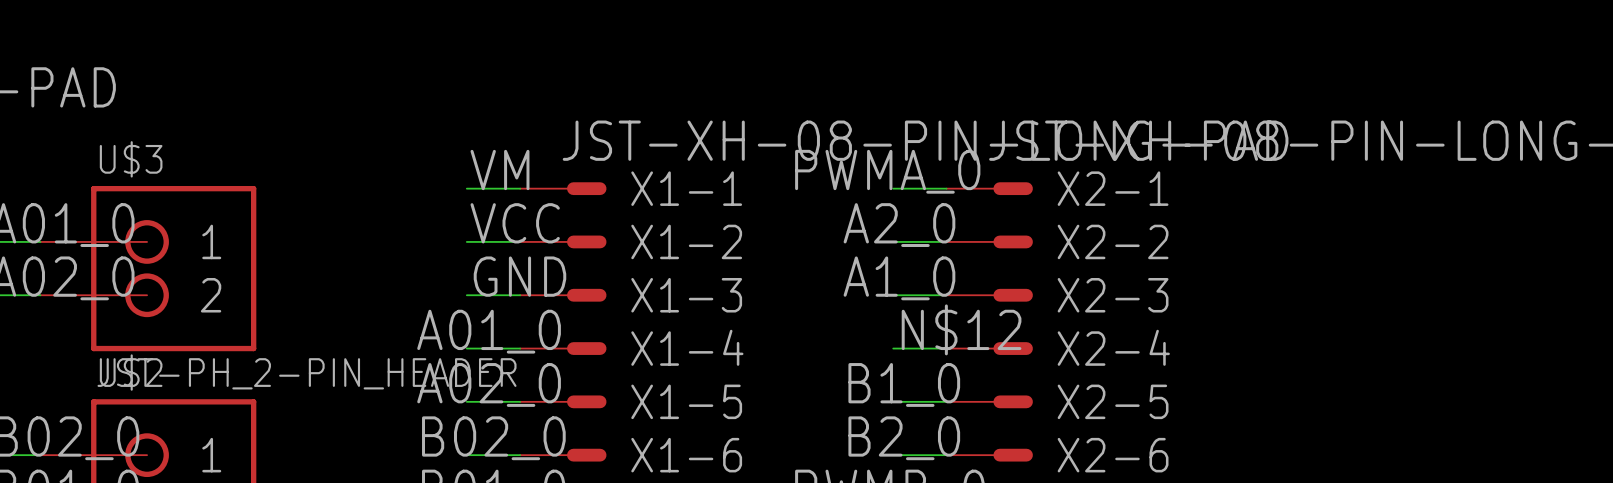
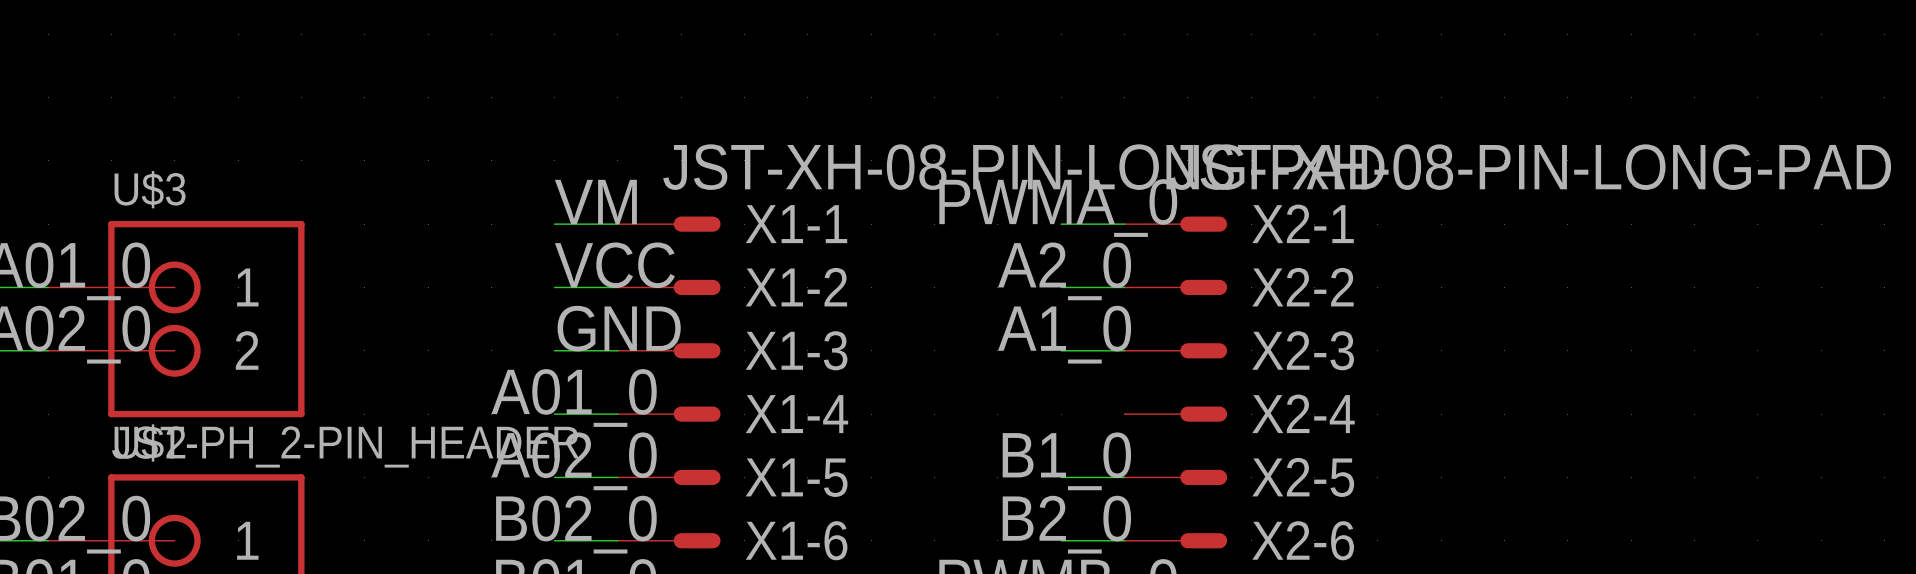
label: N$12 (961, 329) -> none
wire: (893, 348) (946, 348) -> none

